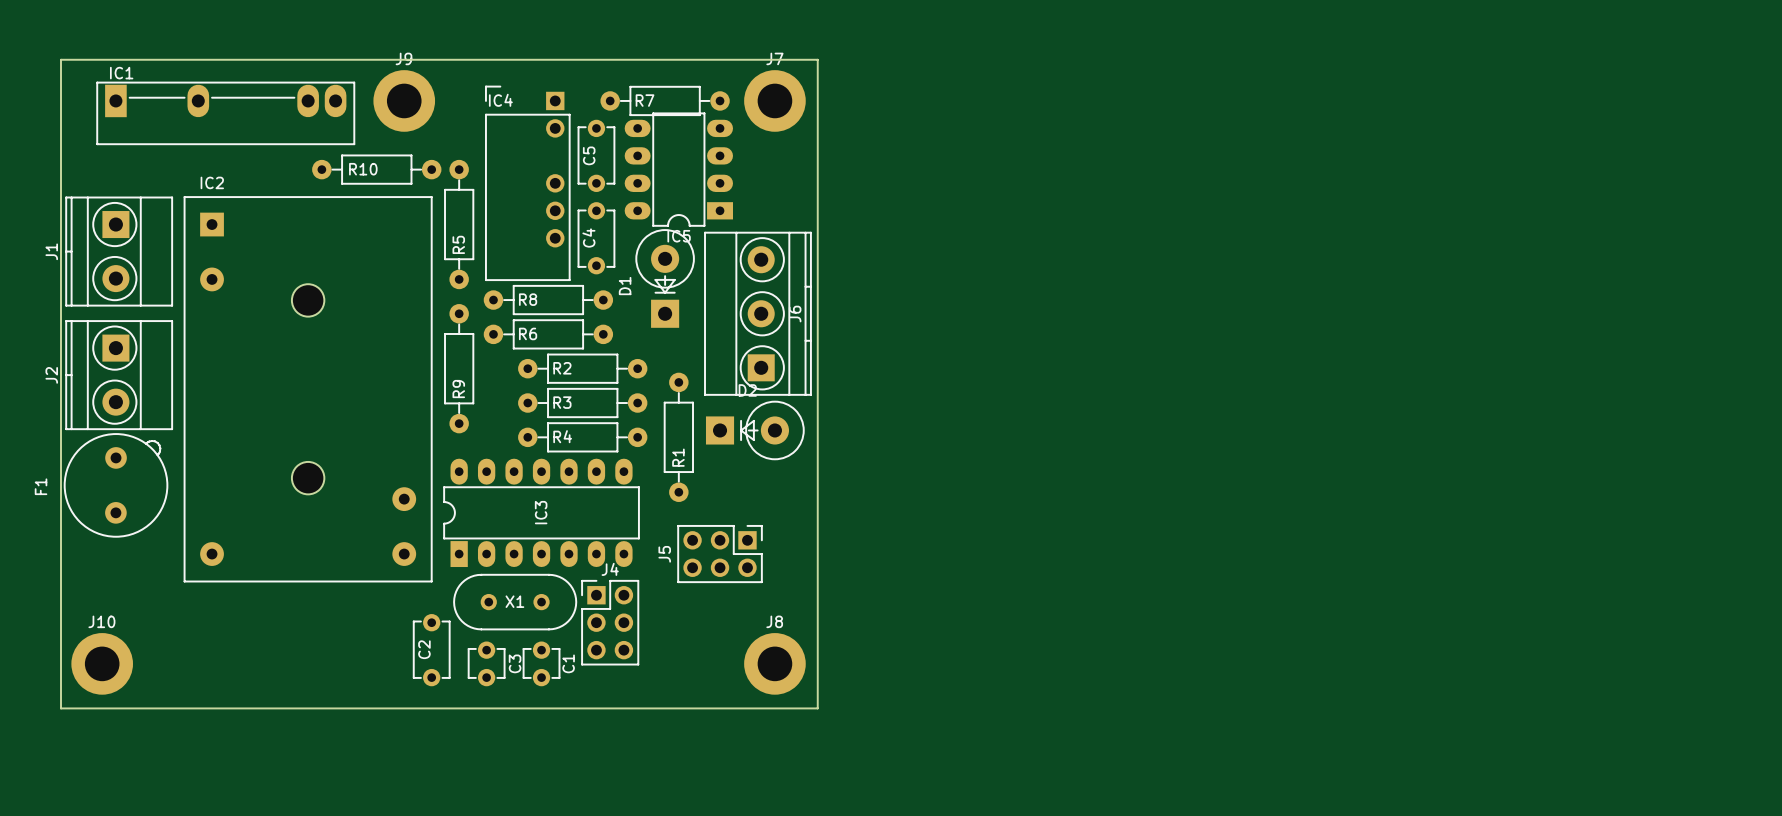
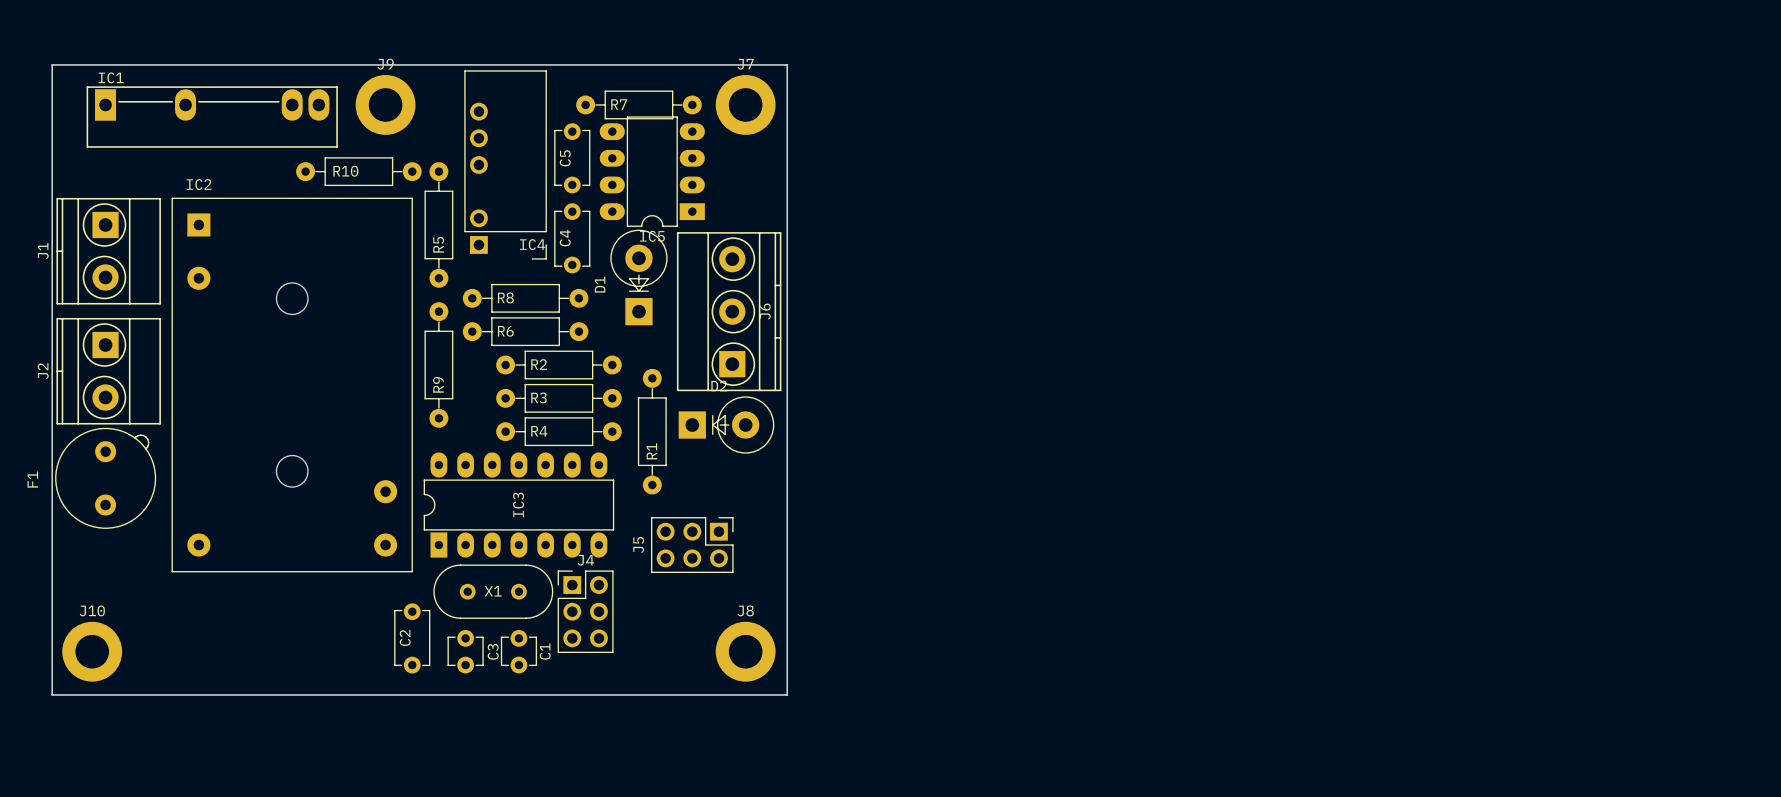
IC4 rotation: 0° (527, 183) -> 180° (505, 164)

